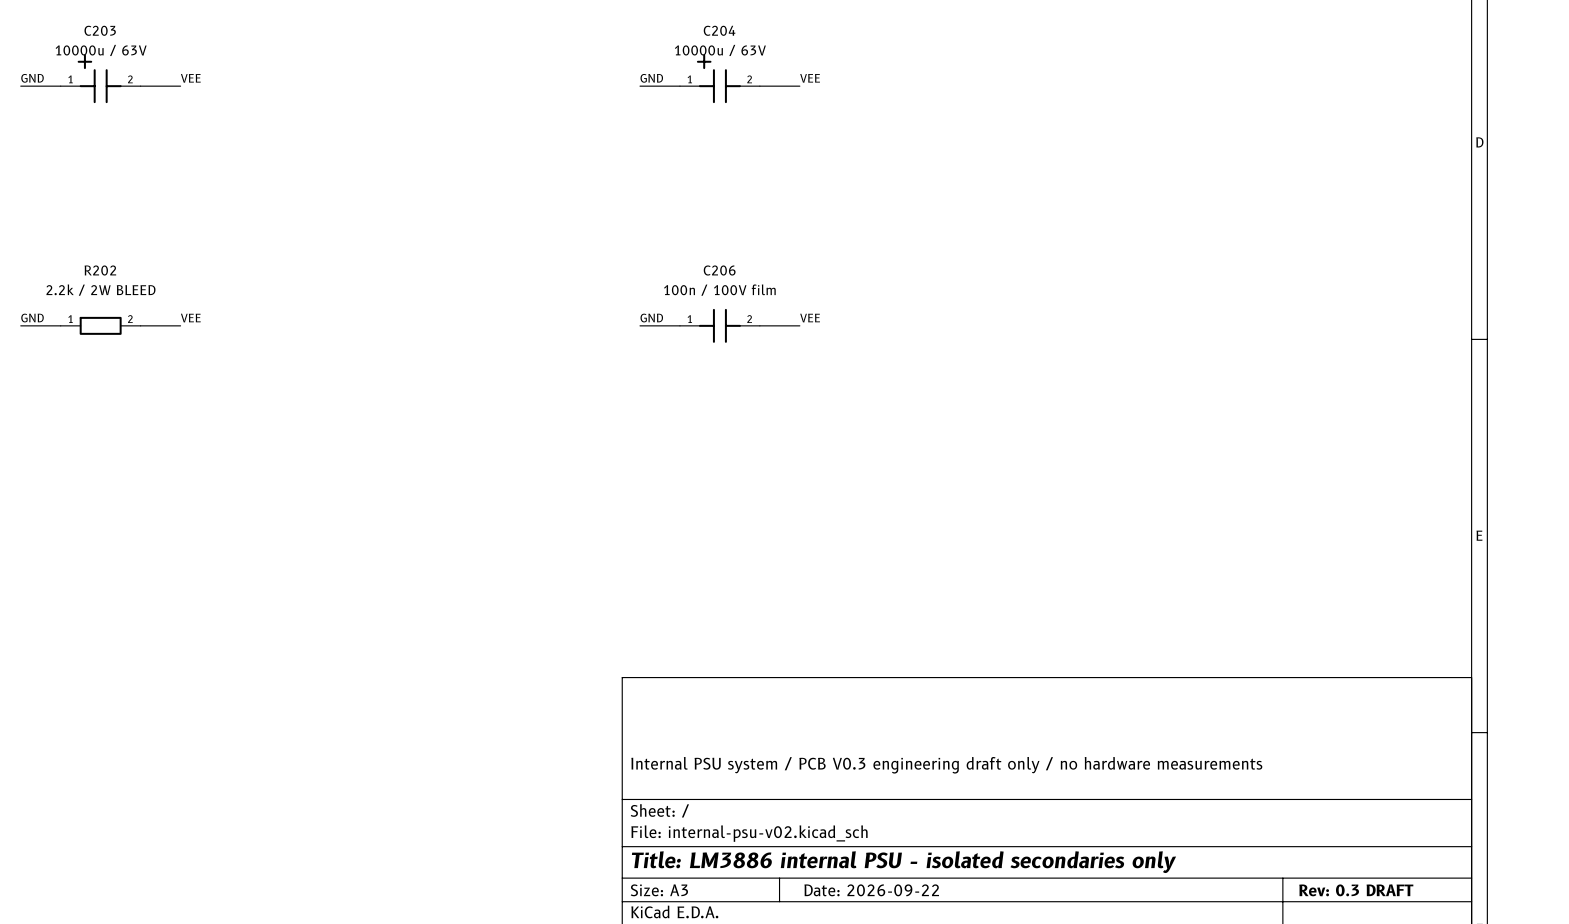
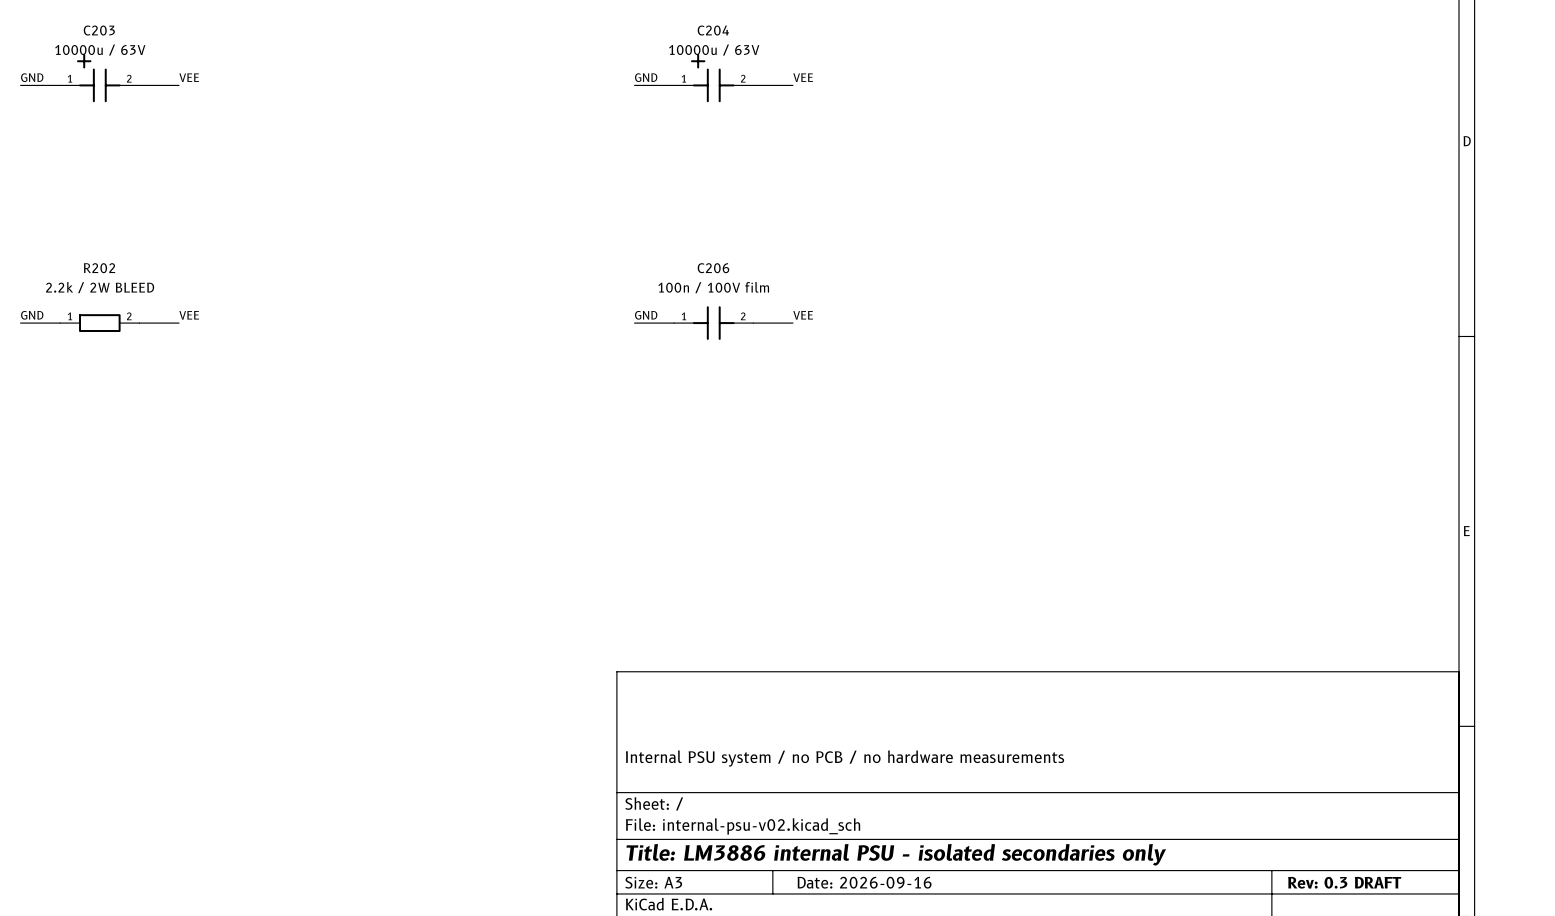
title block: Internal PSU system / PCB V0.3 engineering draft only / no hardware measurements (946, 765) -> Internal PSU system / no PCB / no hardware measurements (845, 758)
title block: Date: 2026-09-22 (871, 890) -> Date: 2026-09-16 (864, 882)

